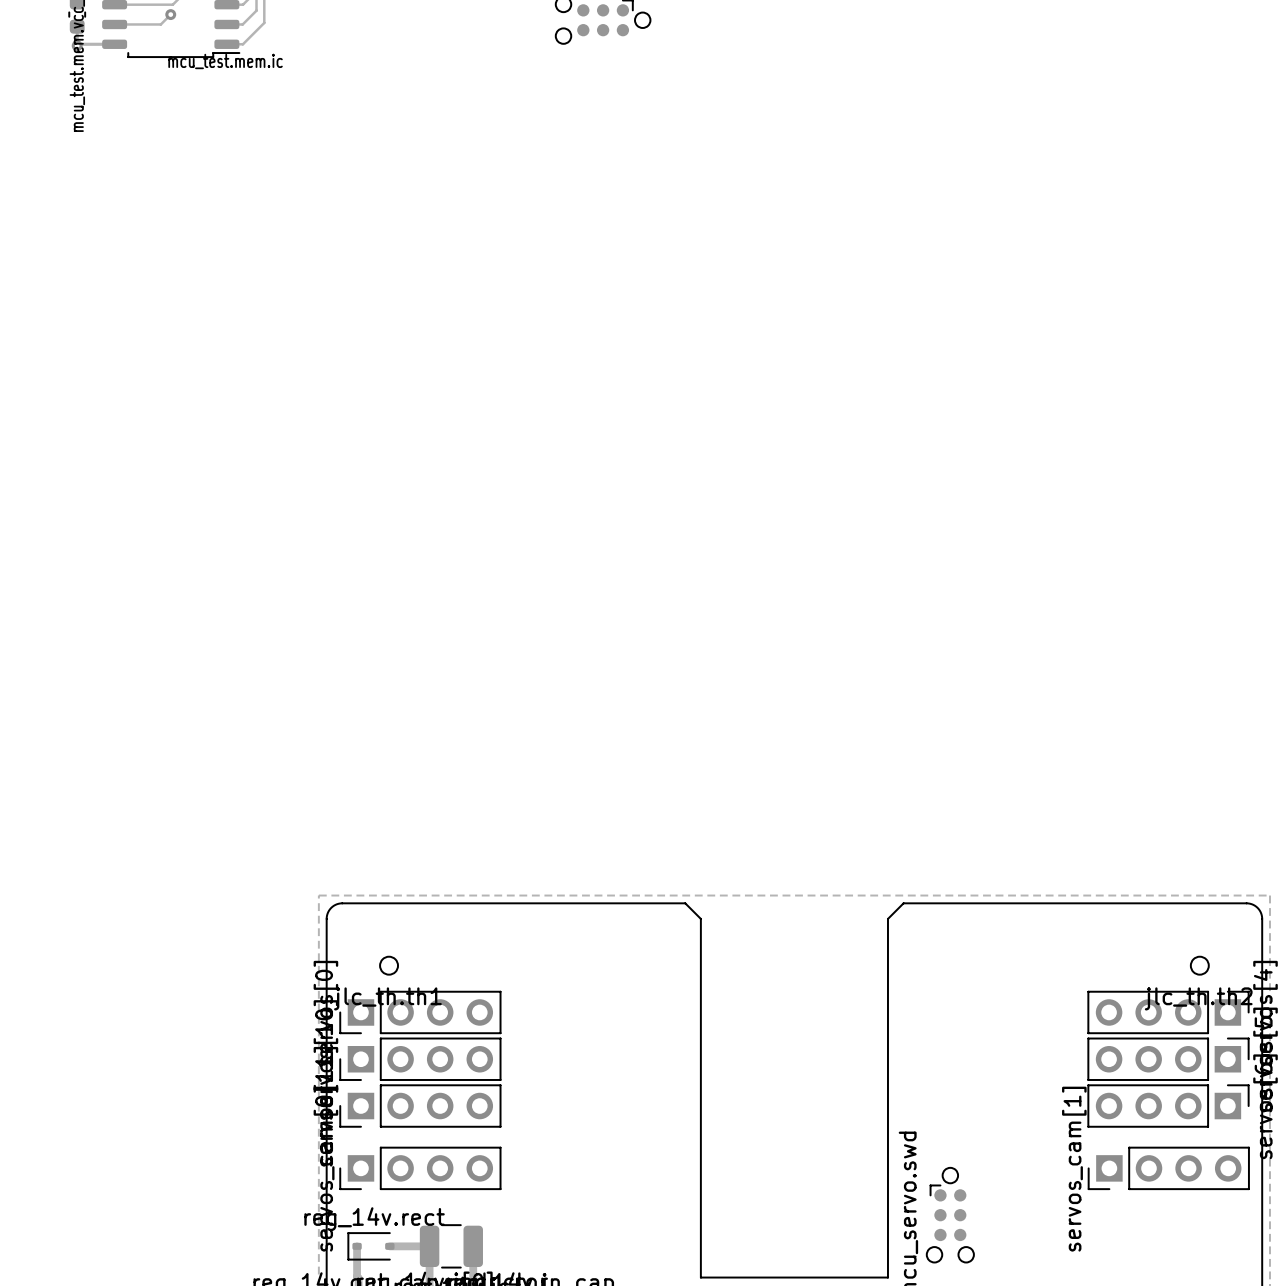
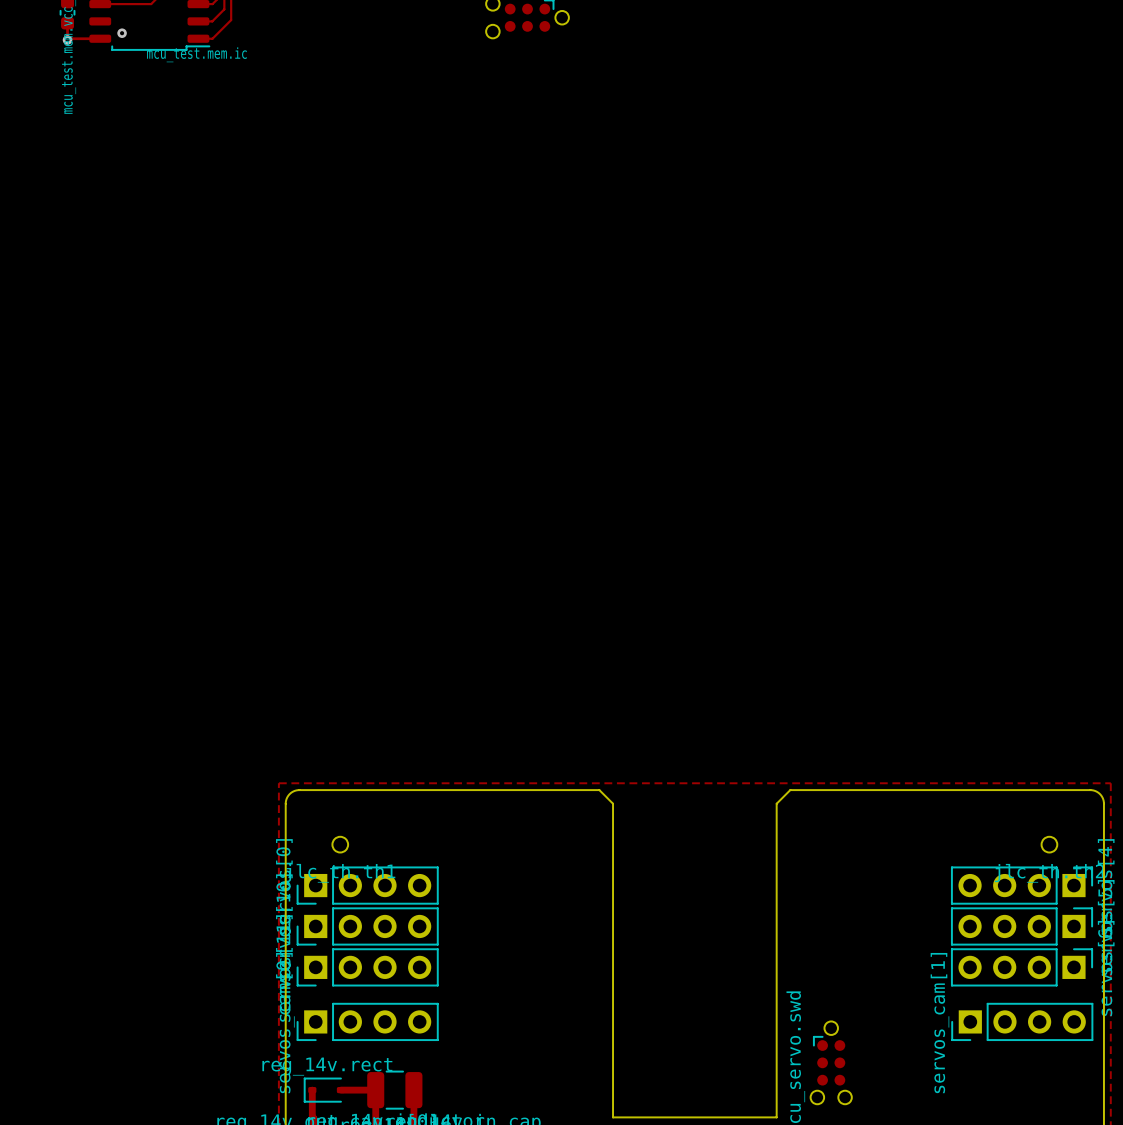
track: (170, 14) (160, 24) (114, 24) -> none
via: (170, 14) -> none
via: none -> (122, 33)

